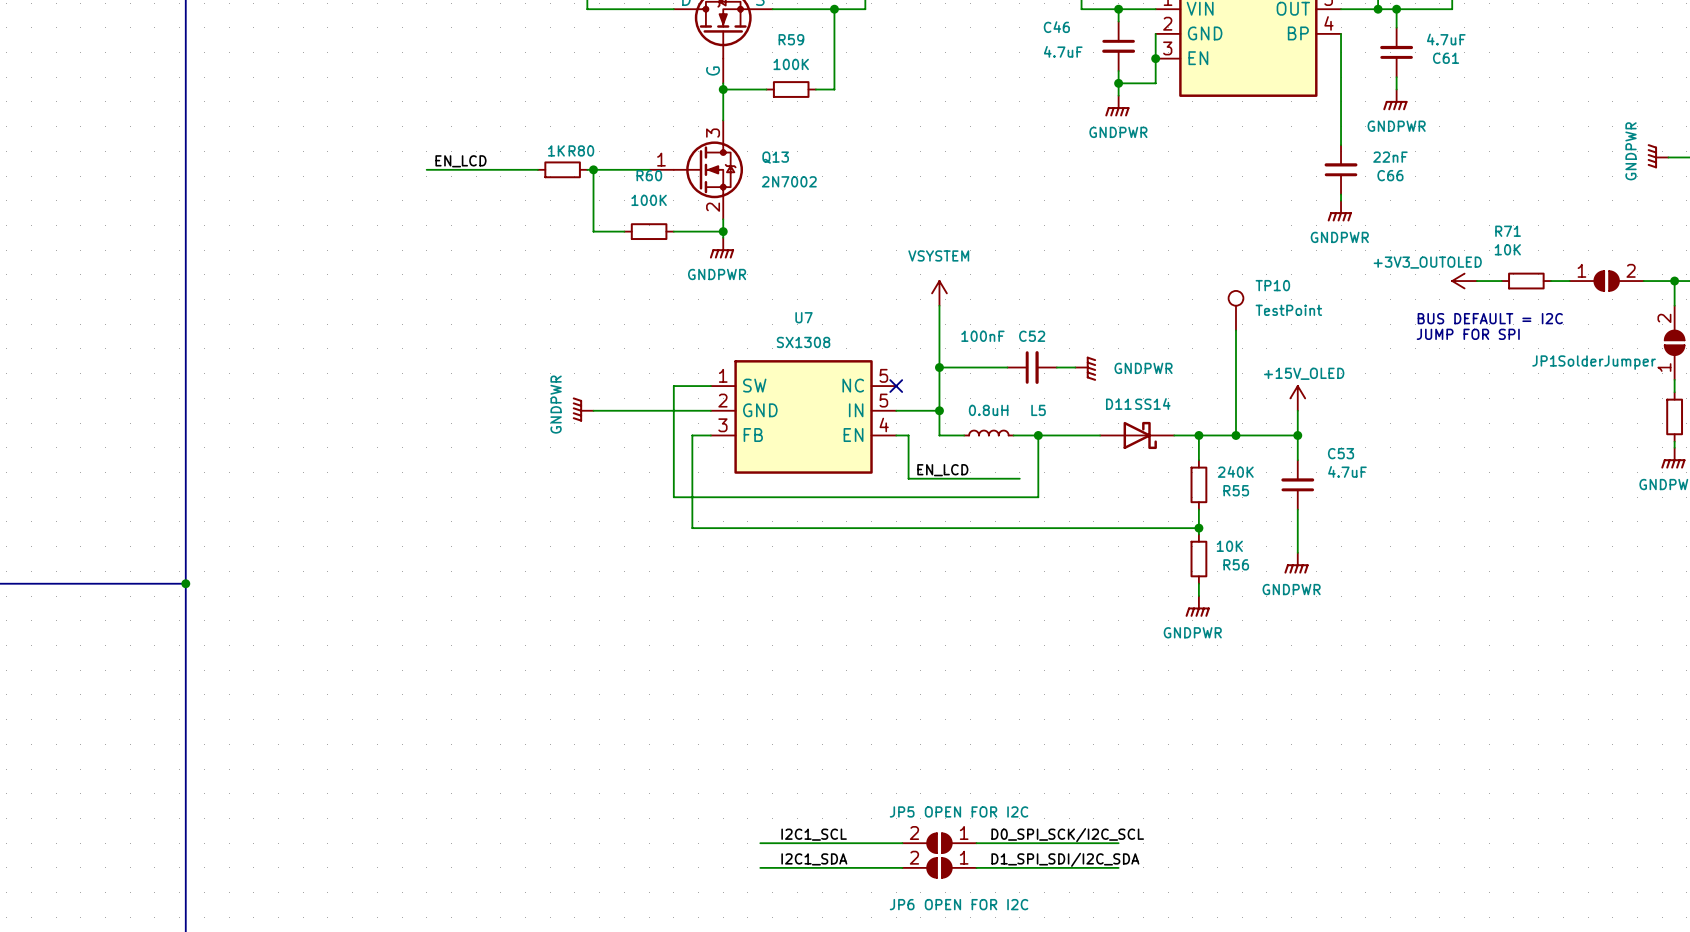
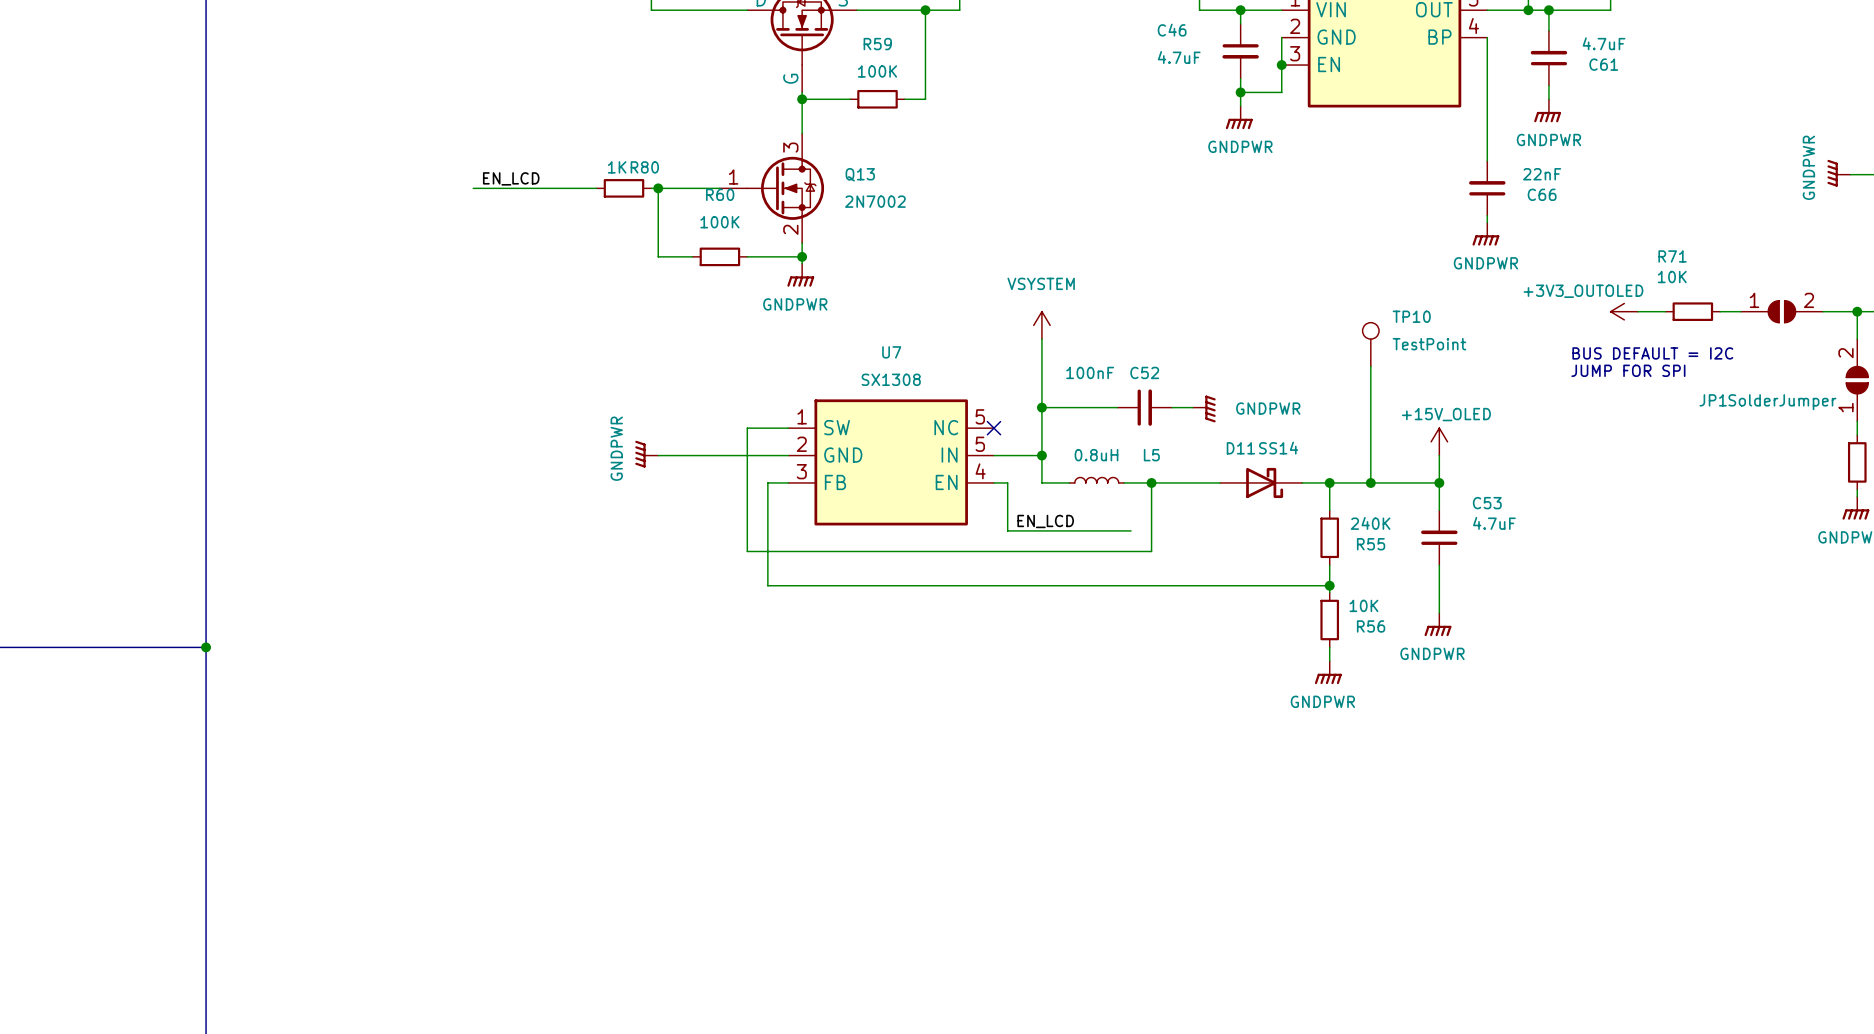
label: I2C1_SCL (814, 834) -> none
label: D0_SPI_SCK/I2C_SCL (1067, 835) -> none
wire: (760, 843) (902, 843) -> none
JP5: OPEN FOR I2C (939, 843) -> none
wire: (976, 843) (1118, 843) -> none
label: I2C1_SDA (814, 859) -> none
label: D1_SPI_SDI/I2C_SDA (1065, 859) -> none
wire: (760, 867) (902, 867) -> none
JP6: OPEN FOR I2C (939, 867) -> none
wire: (976, 867) (1118, 867) -> none

